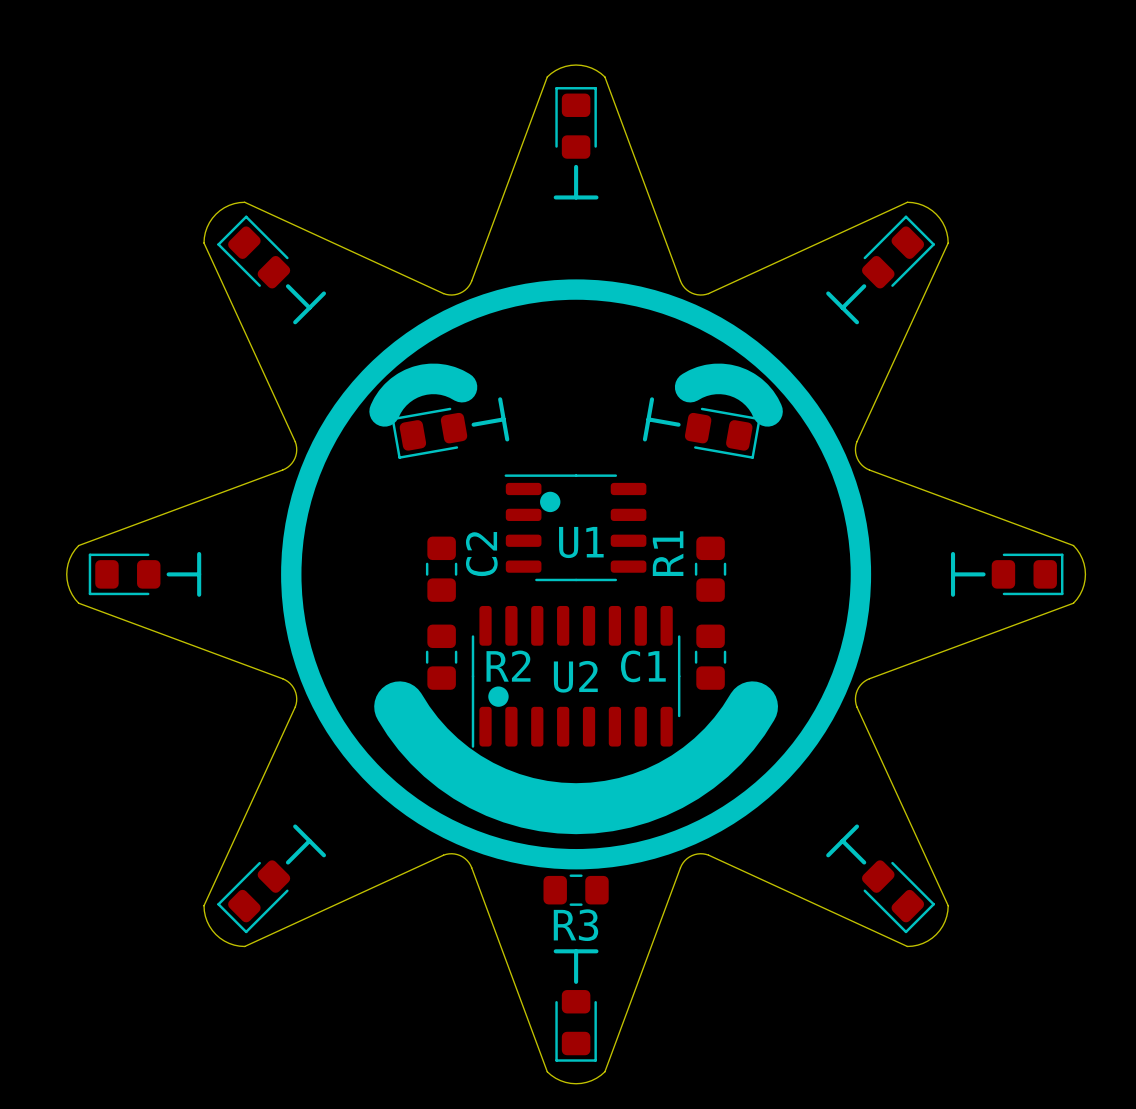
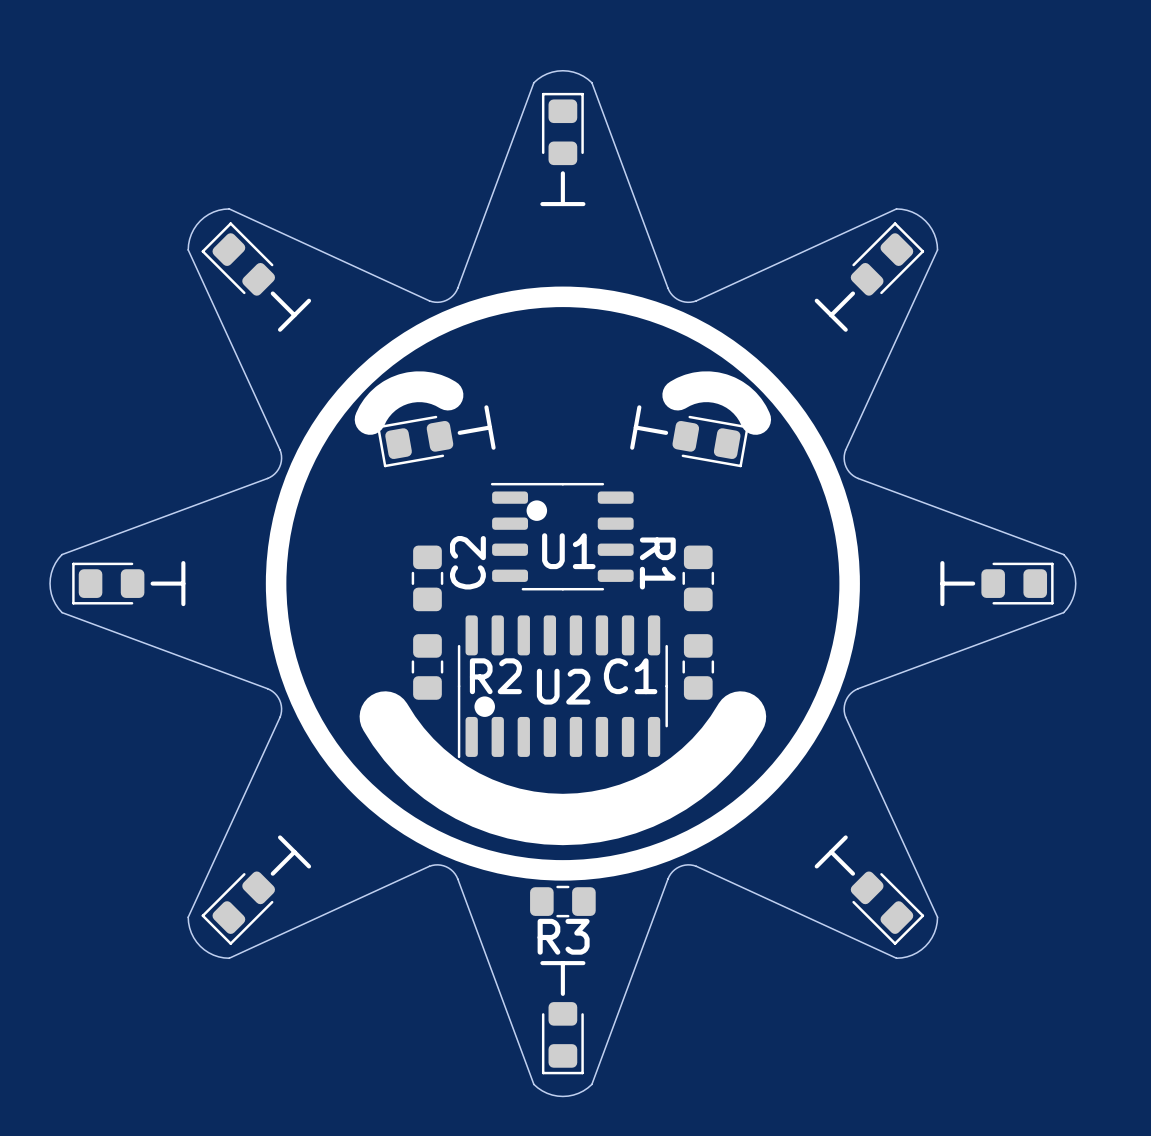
R1 name rotation: 0° (668, 553) -> 180° (657, 563)

